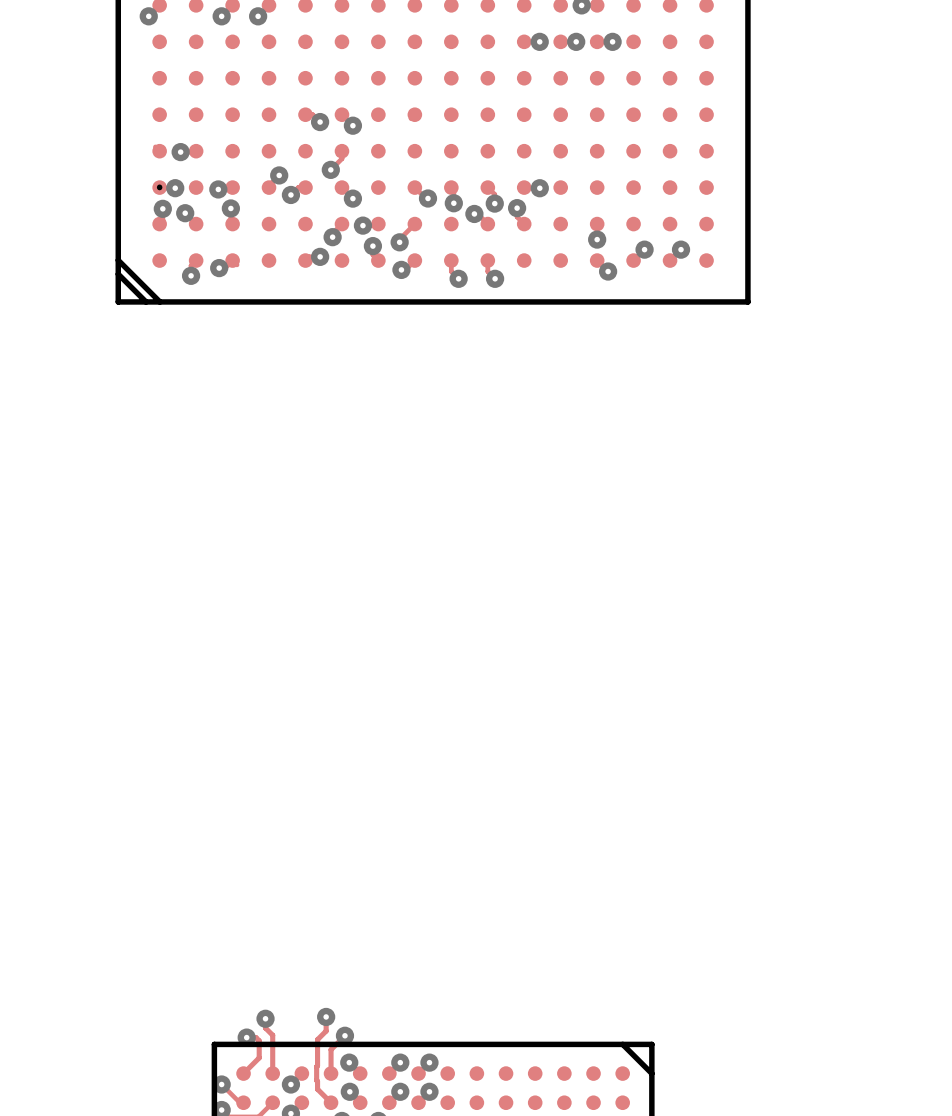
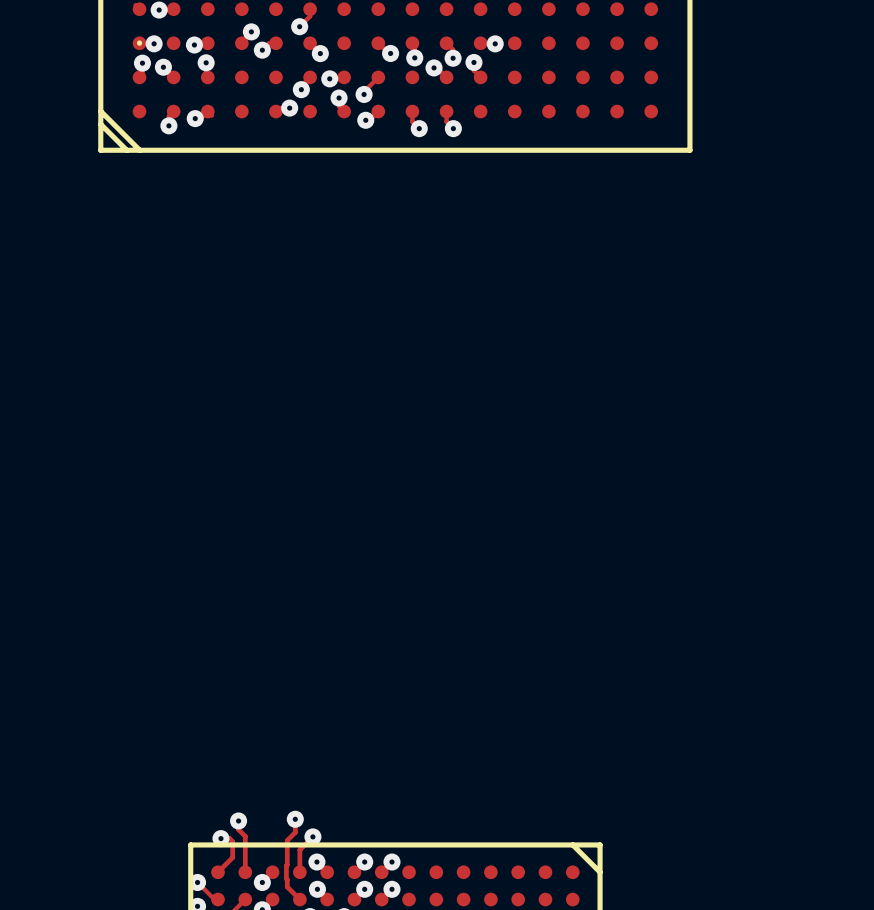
via: (597, 239) -> none
via: (644, 249) -> none
via: (681, 249) -> none
via: (608, 271) -> none

